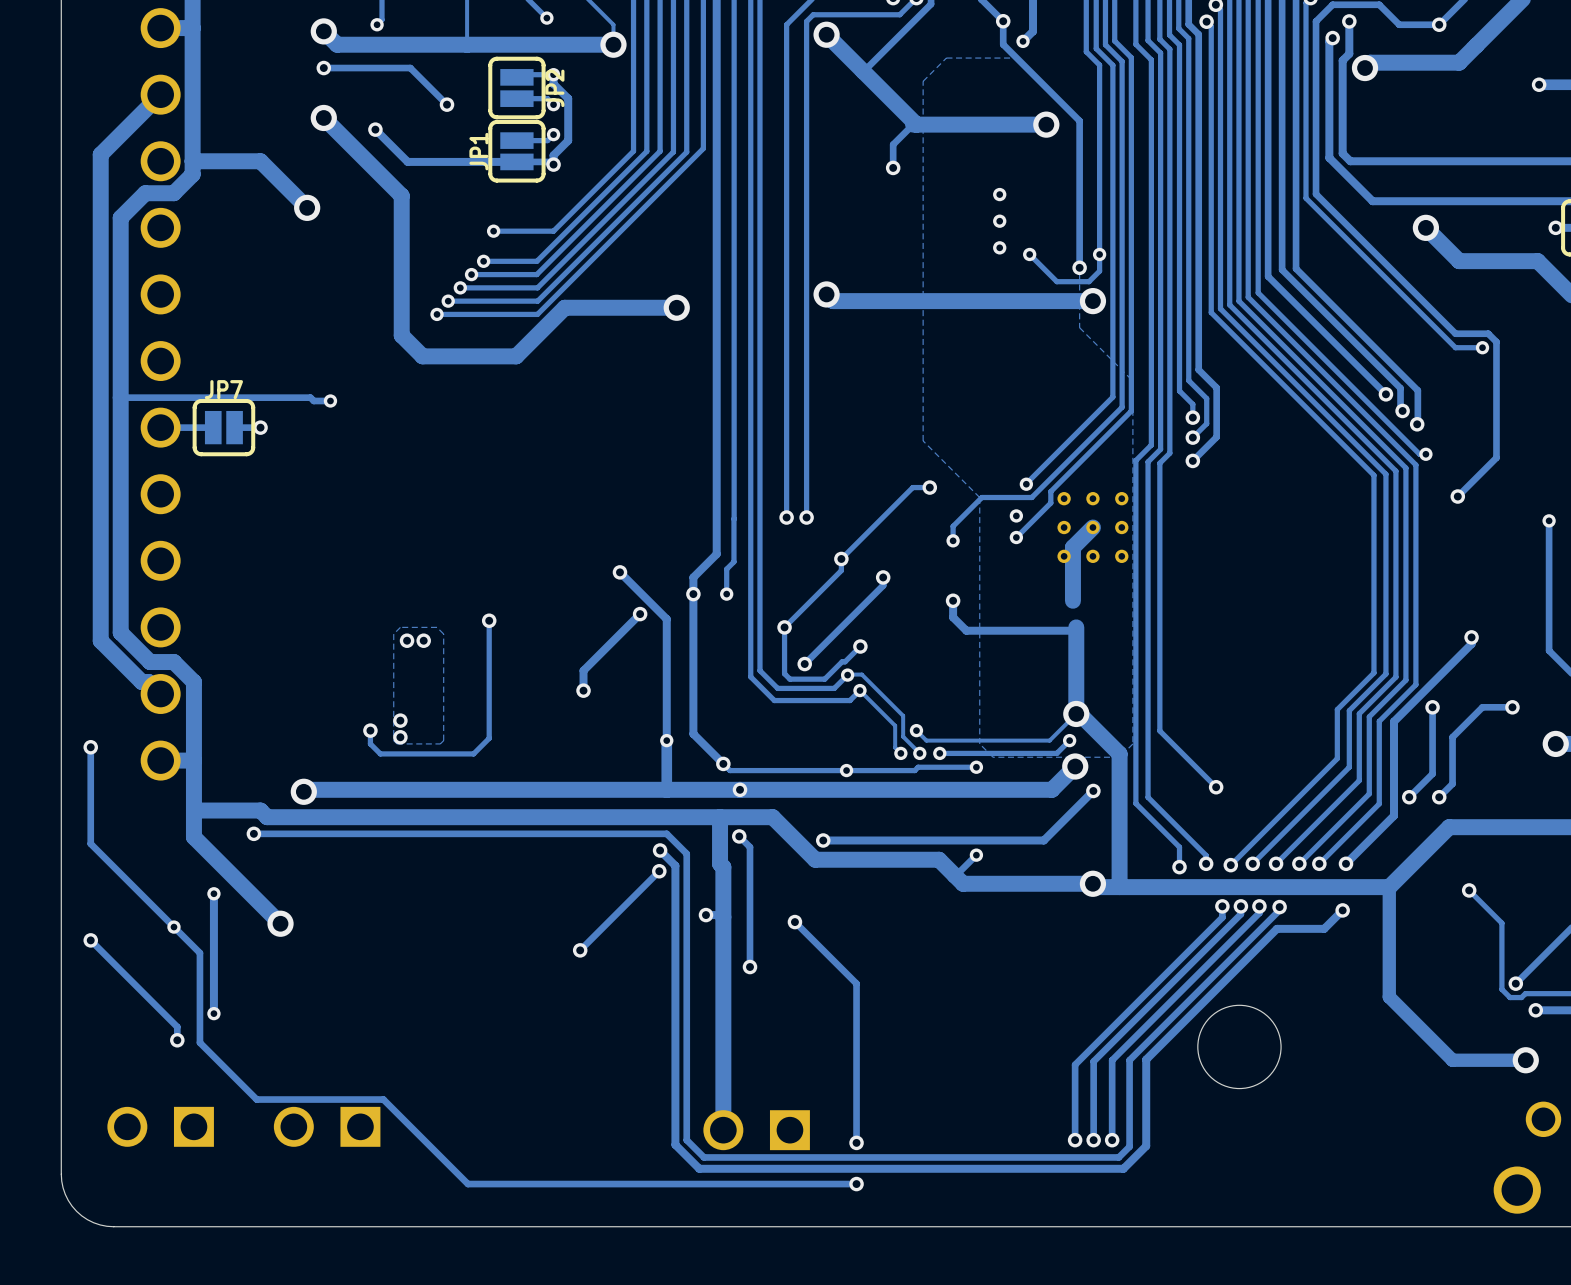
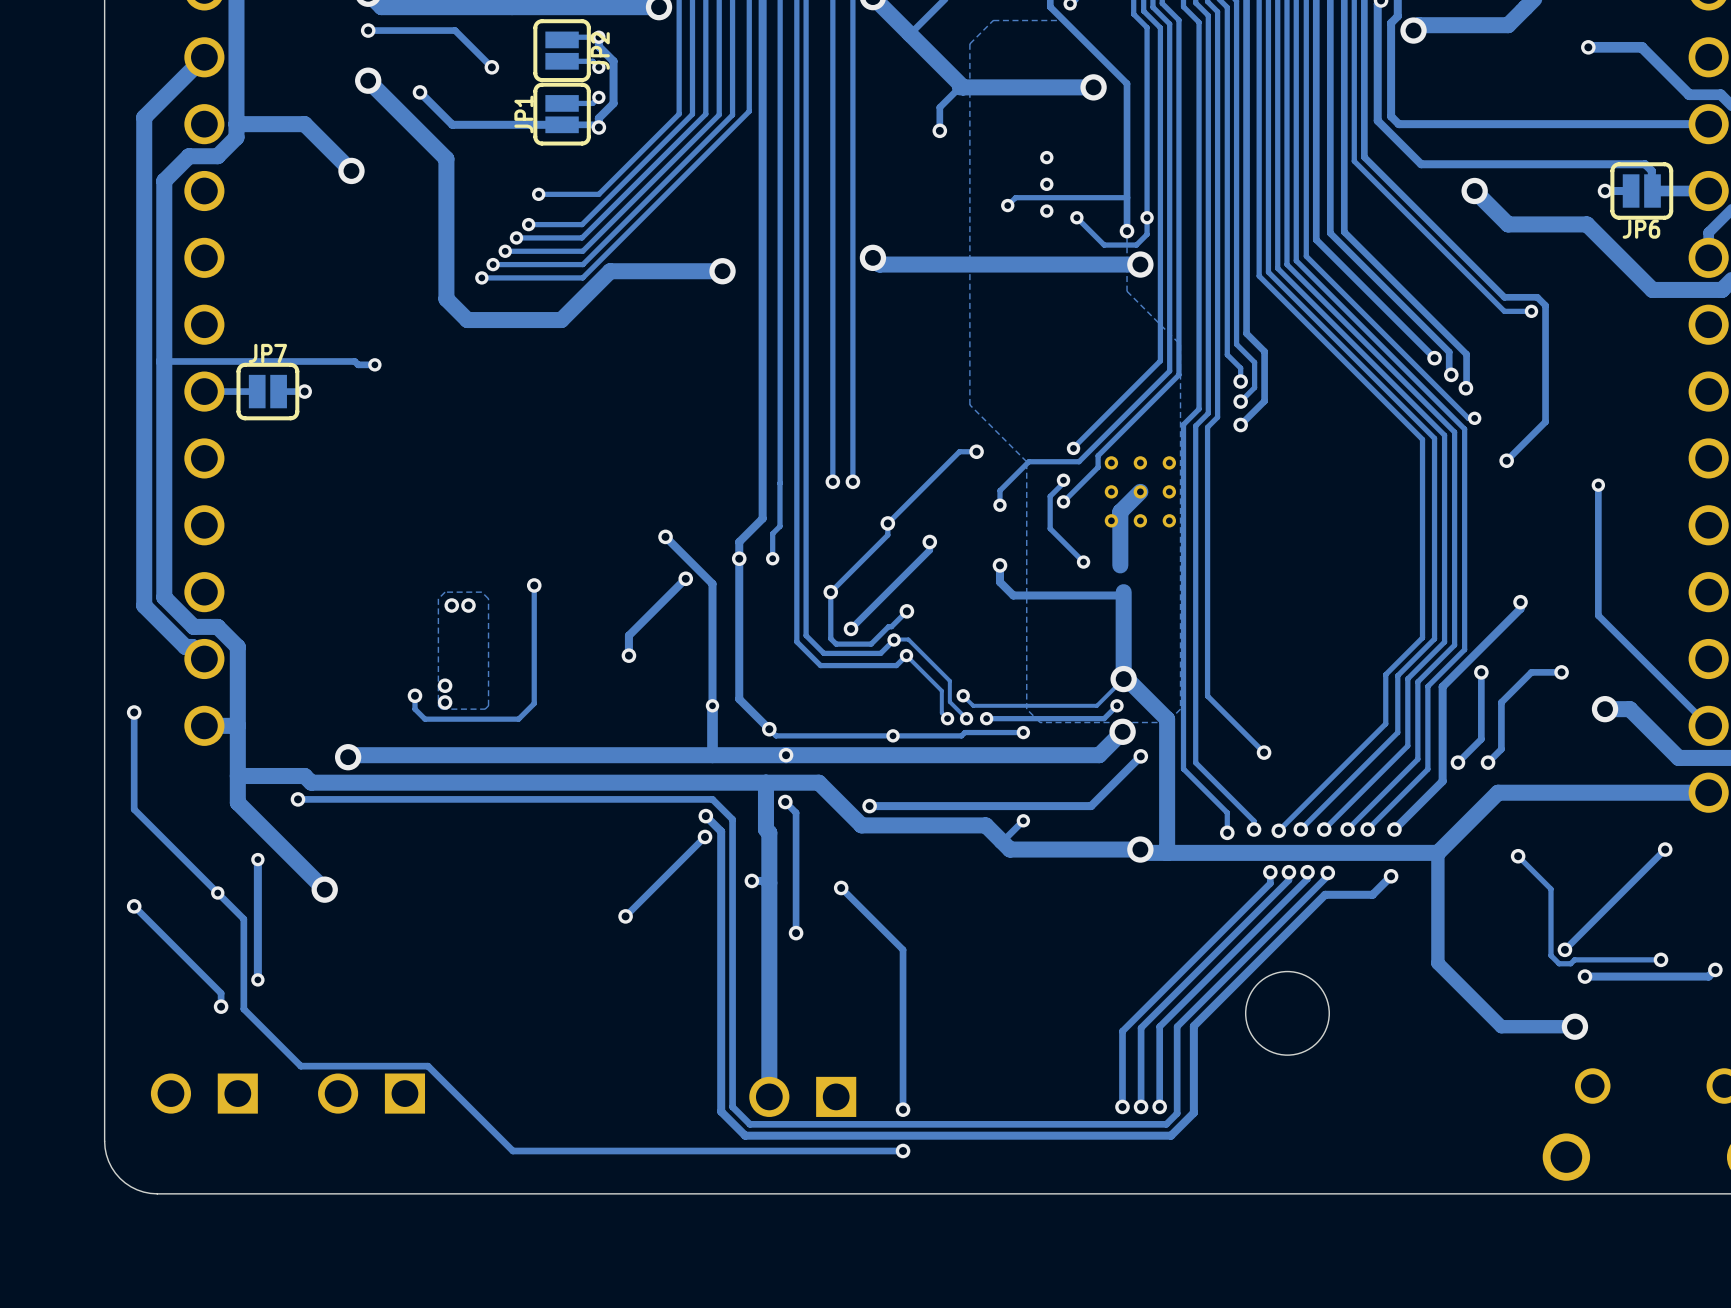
track: none -> (1127, 197) (1015, 197) (1007, 205)
via: none -> (1007, 205)
track: none -> (1063, 481) (1050, 496) (1050, 528) (1083, 562)
via: none -> (1083, 562)

